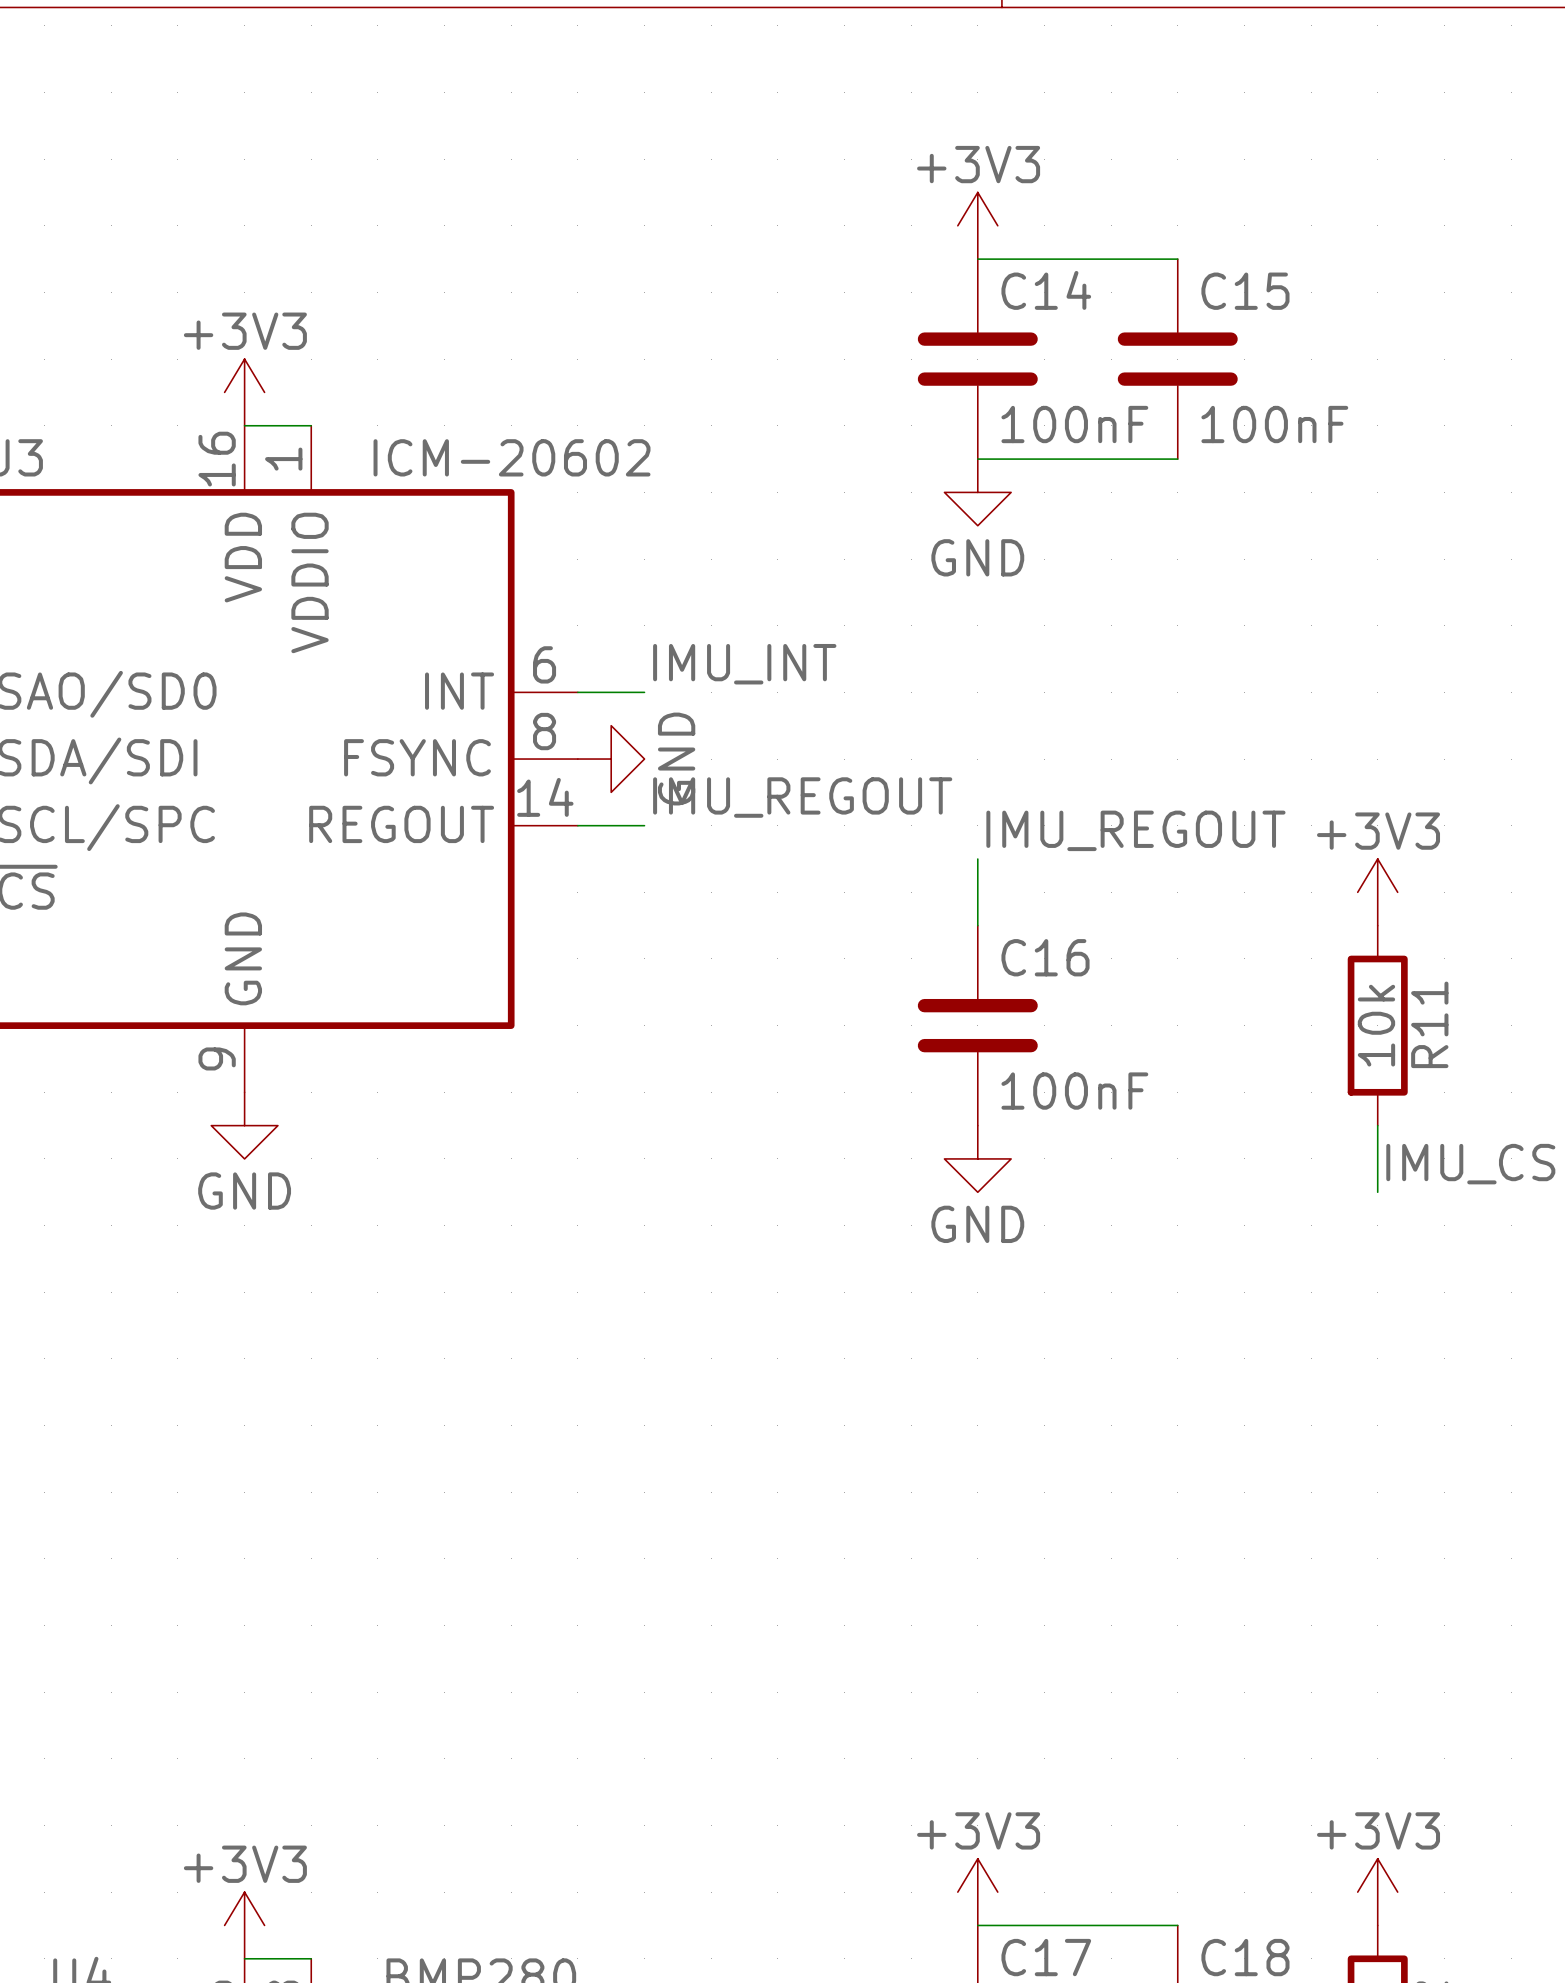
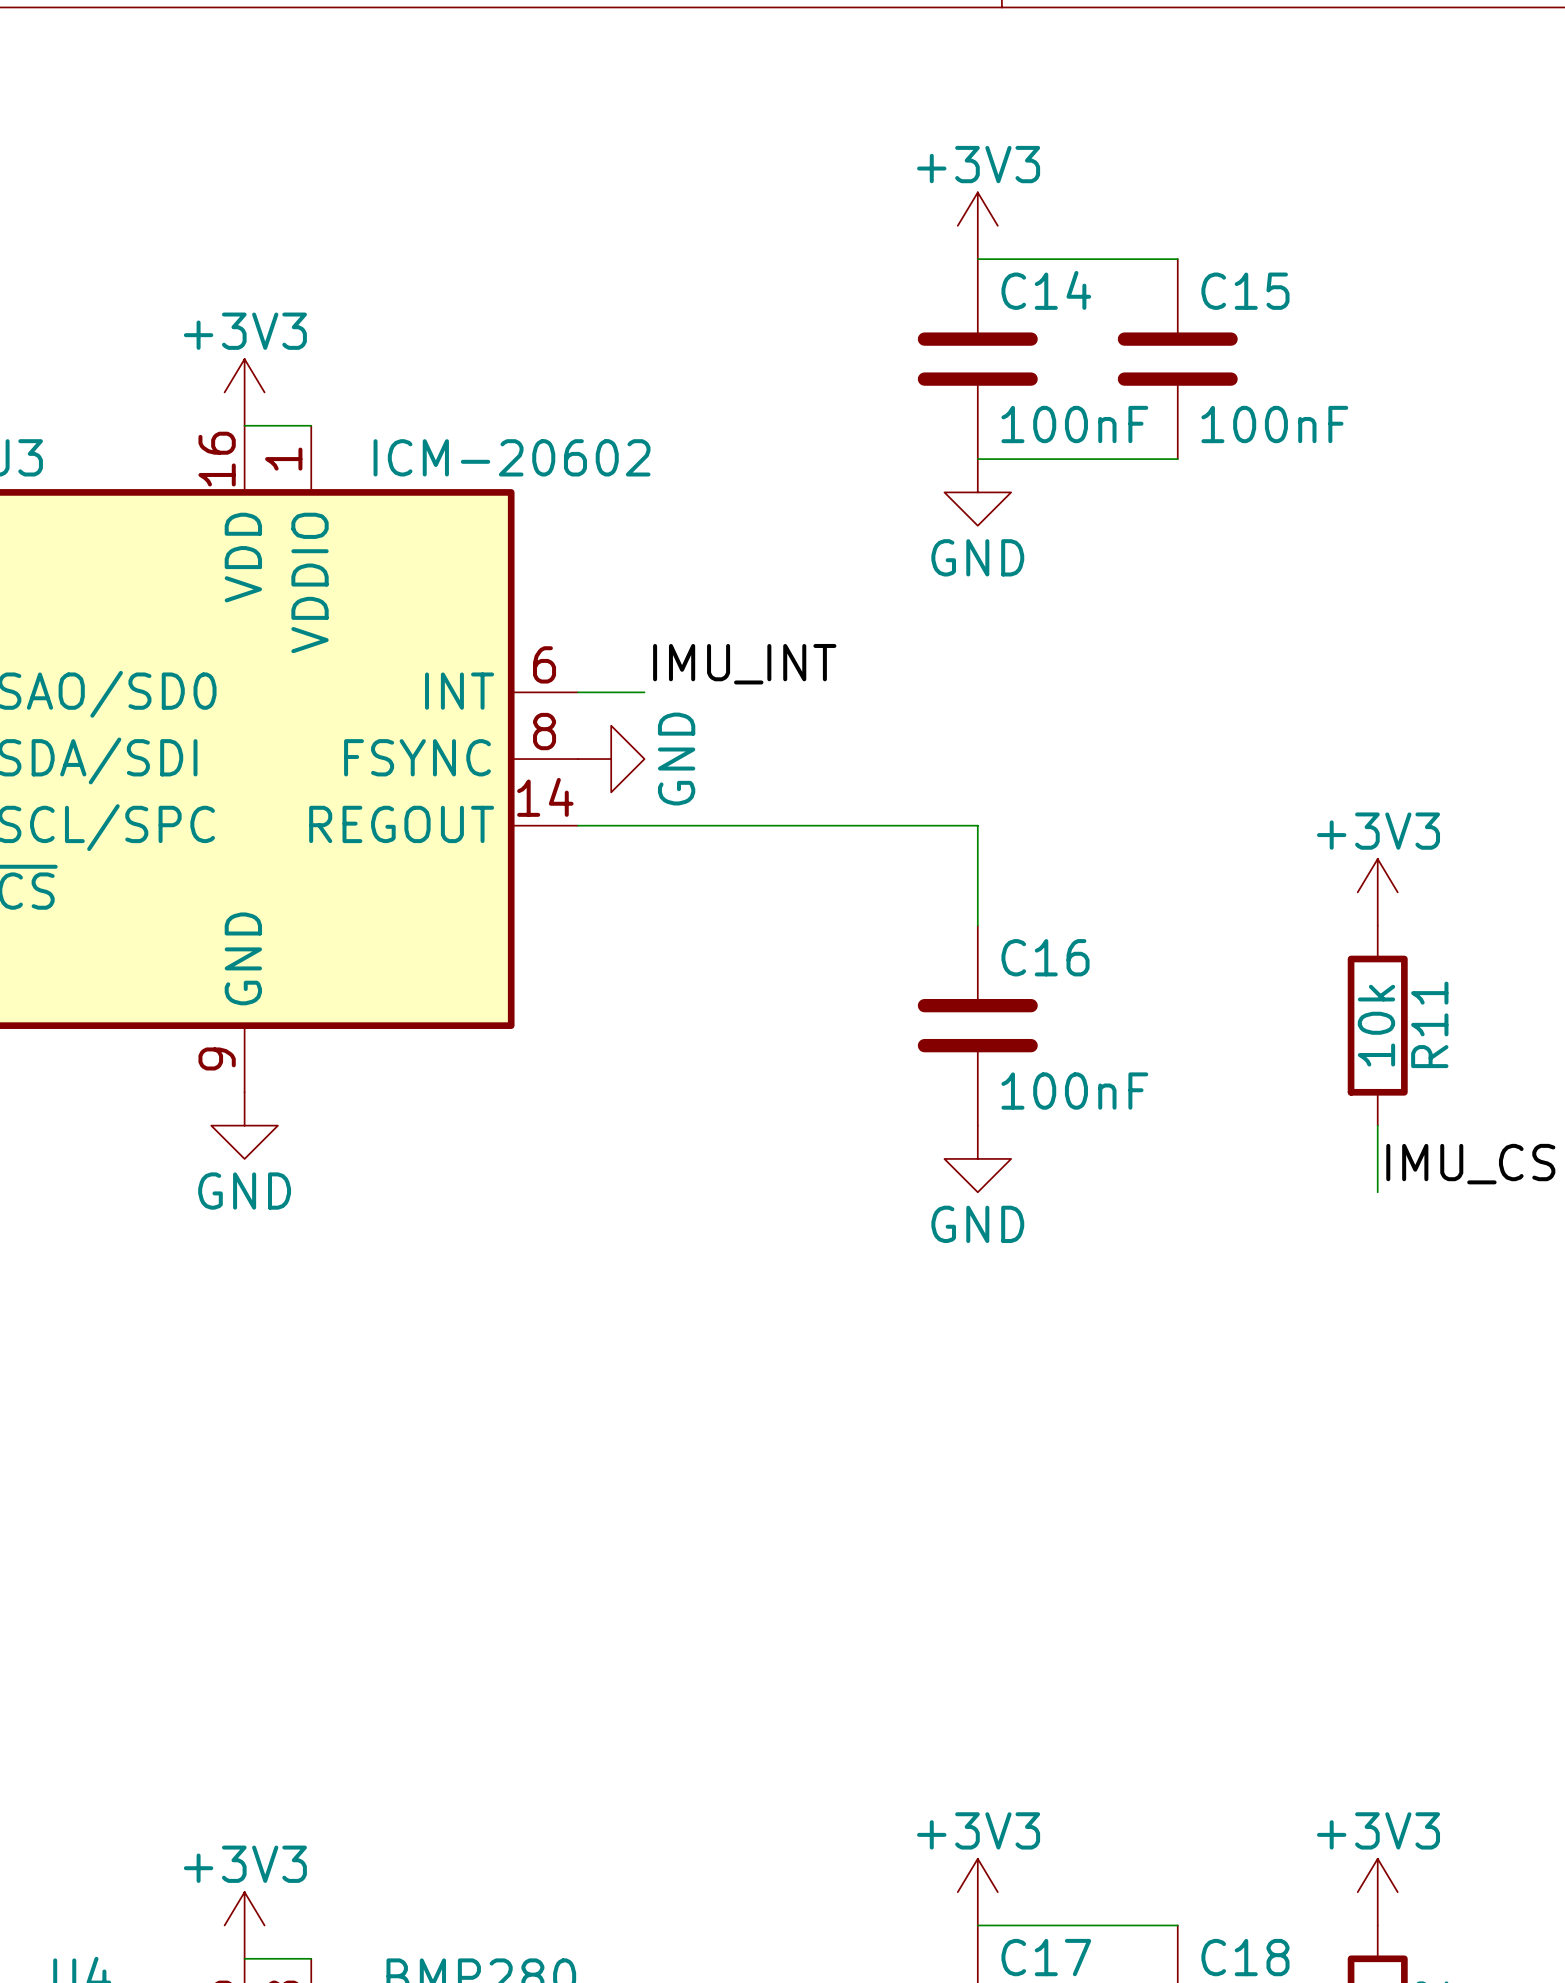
label: IMU_REGOUT (802, 797) -> none
wire: none -> (644, 825) (977, 825) (977, 859)
label: IMU_REGOUT (1135, 830) -> none

